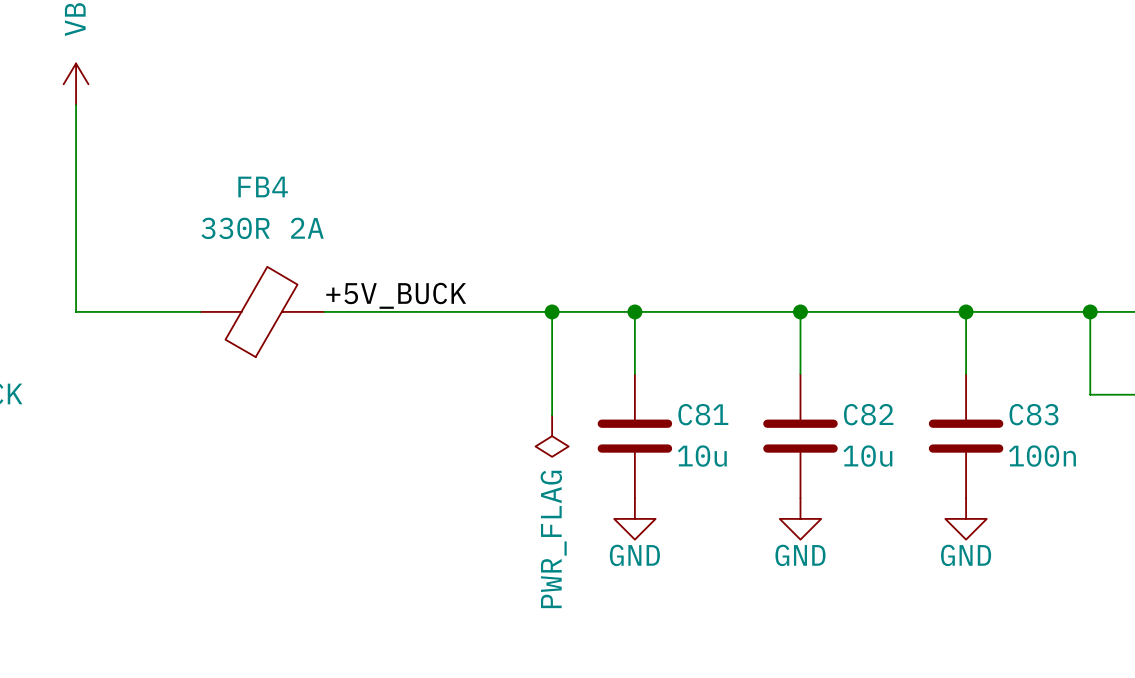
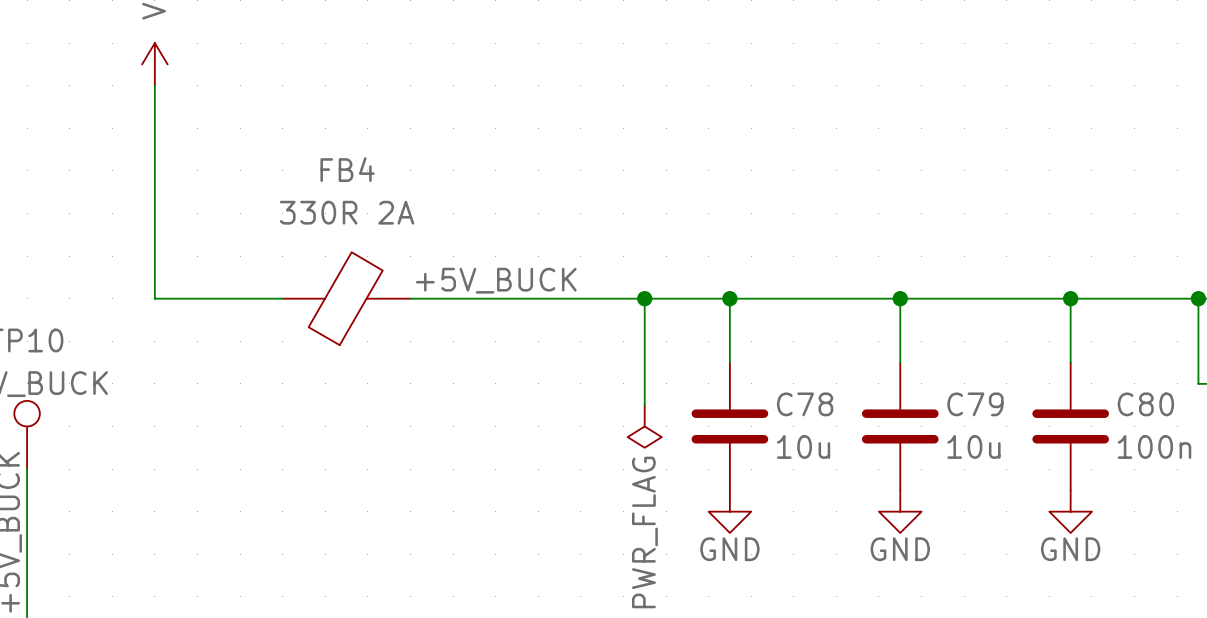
C81 name: C81 (703, 414) -> C78 (805, 404)
C82 name: C82 (868, 414) -> C79 (975, 404)
C83 name: C83 (1033, 414) -> C80 (1145, 404)

